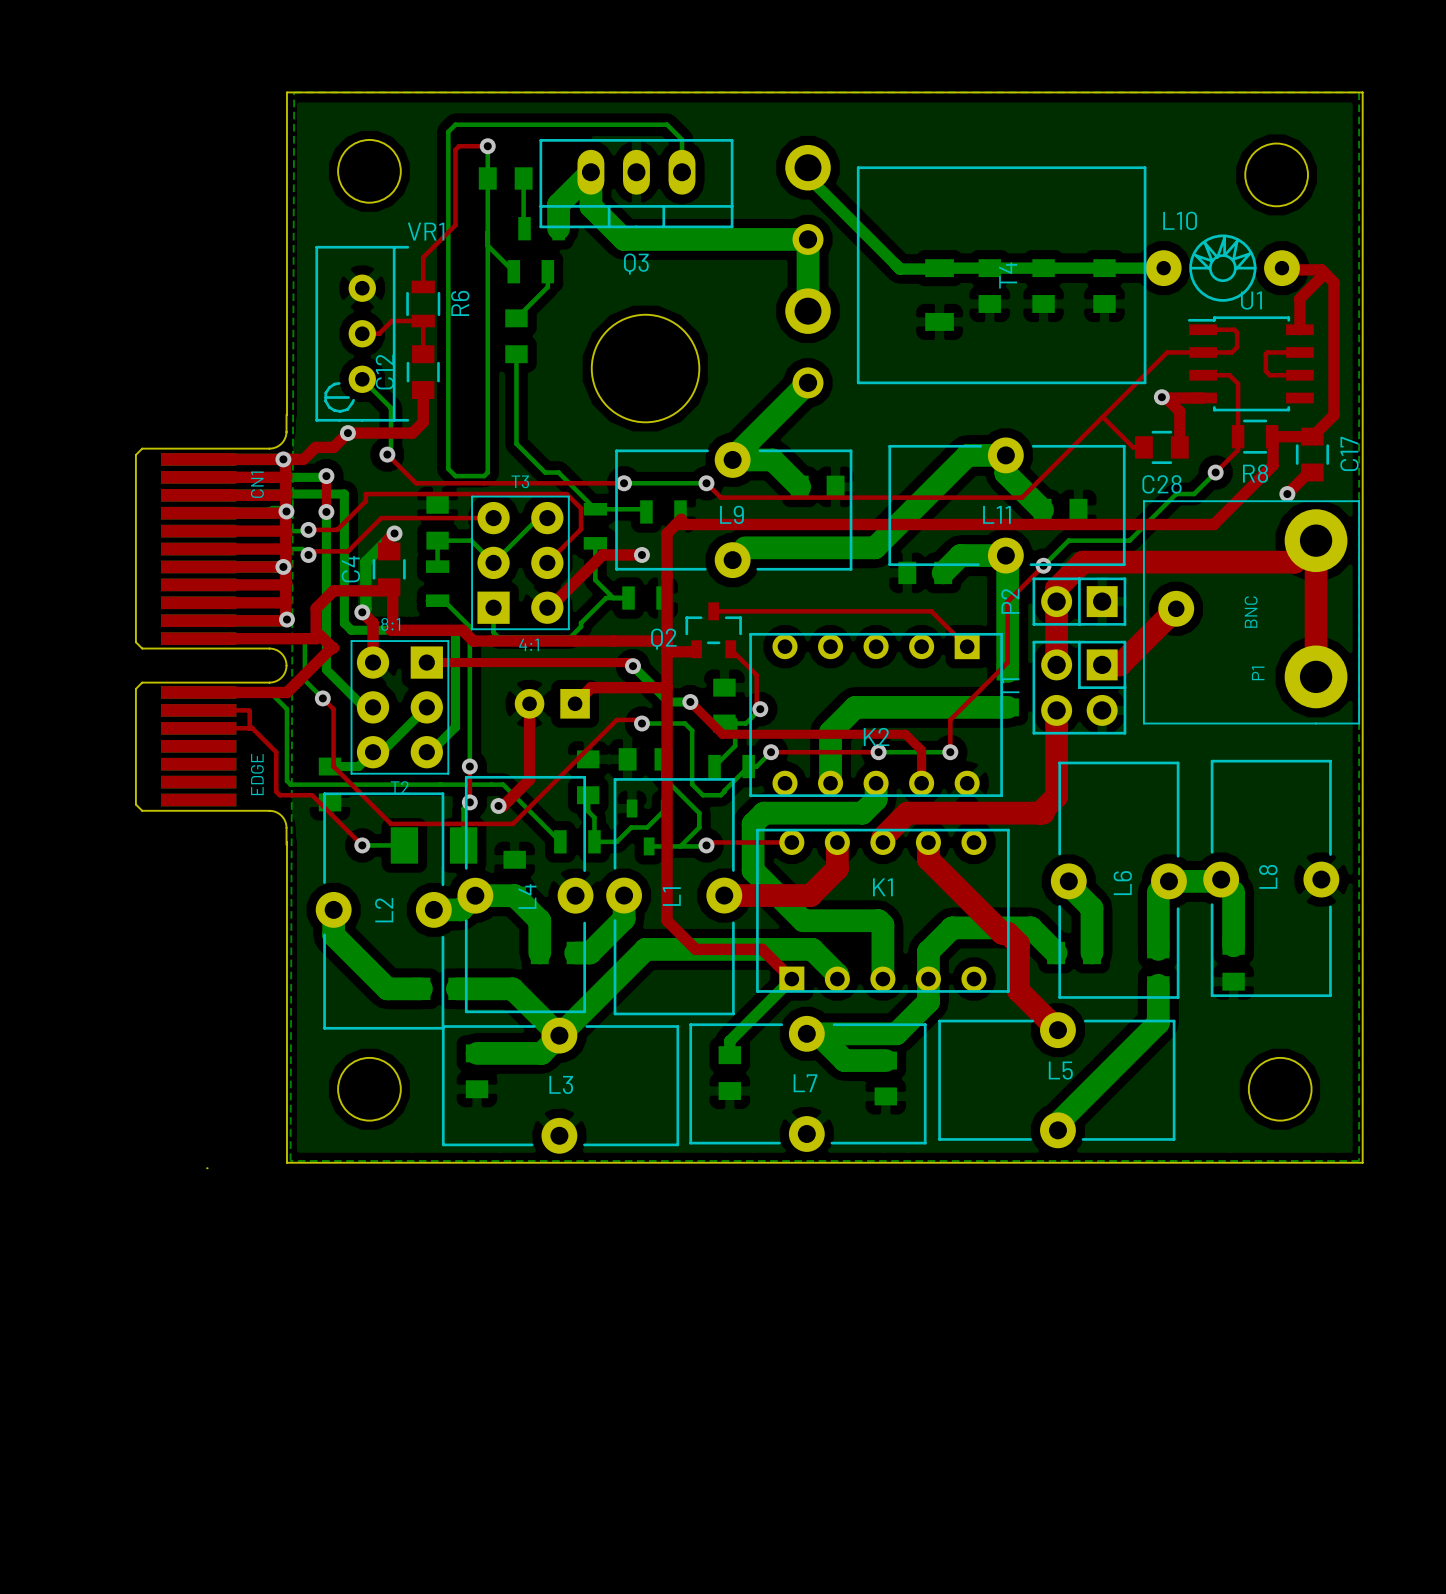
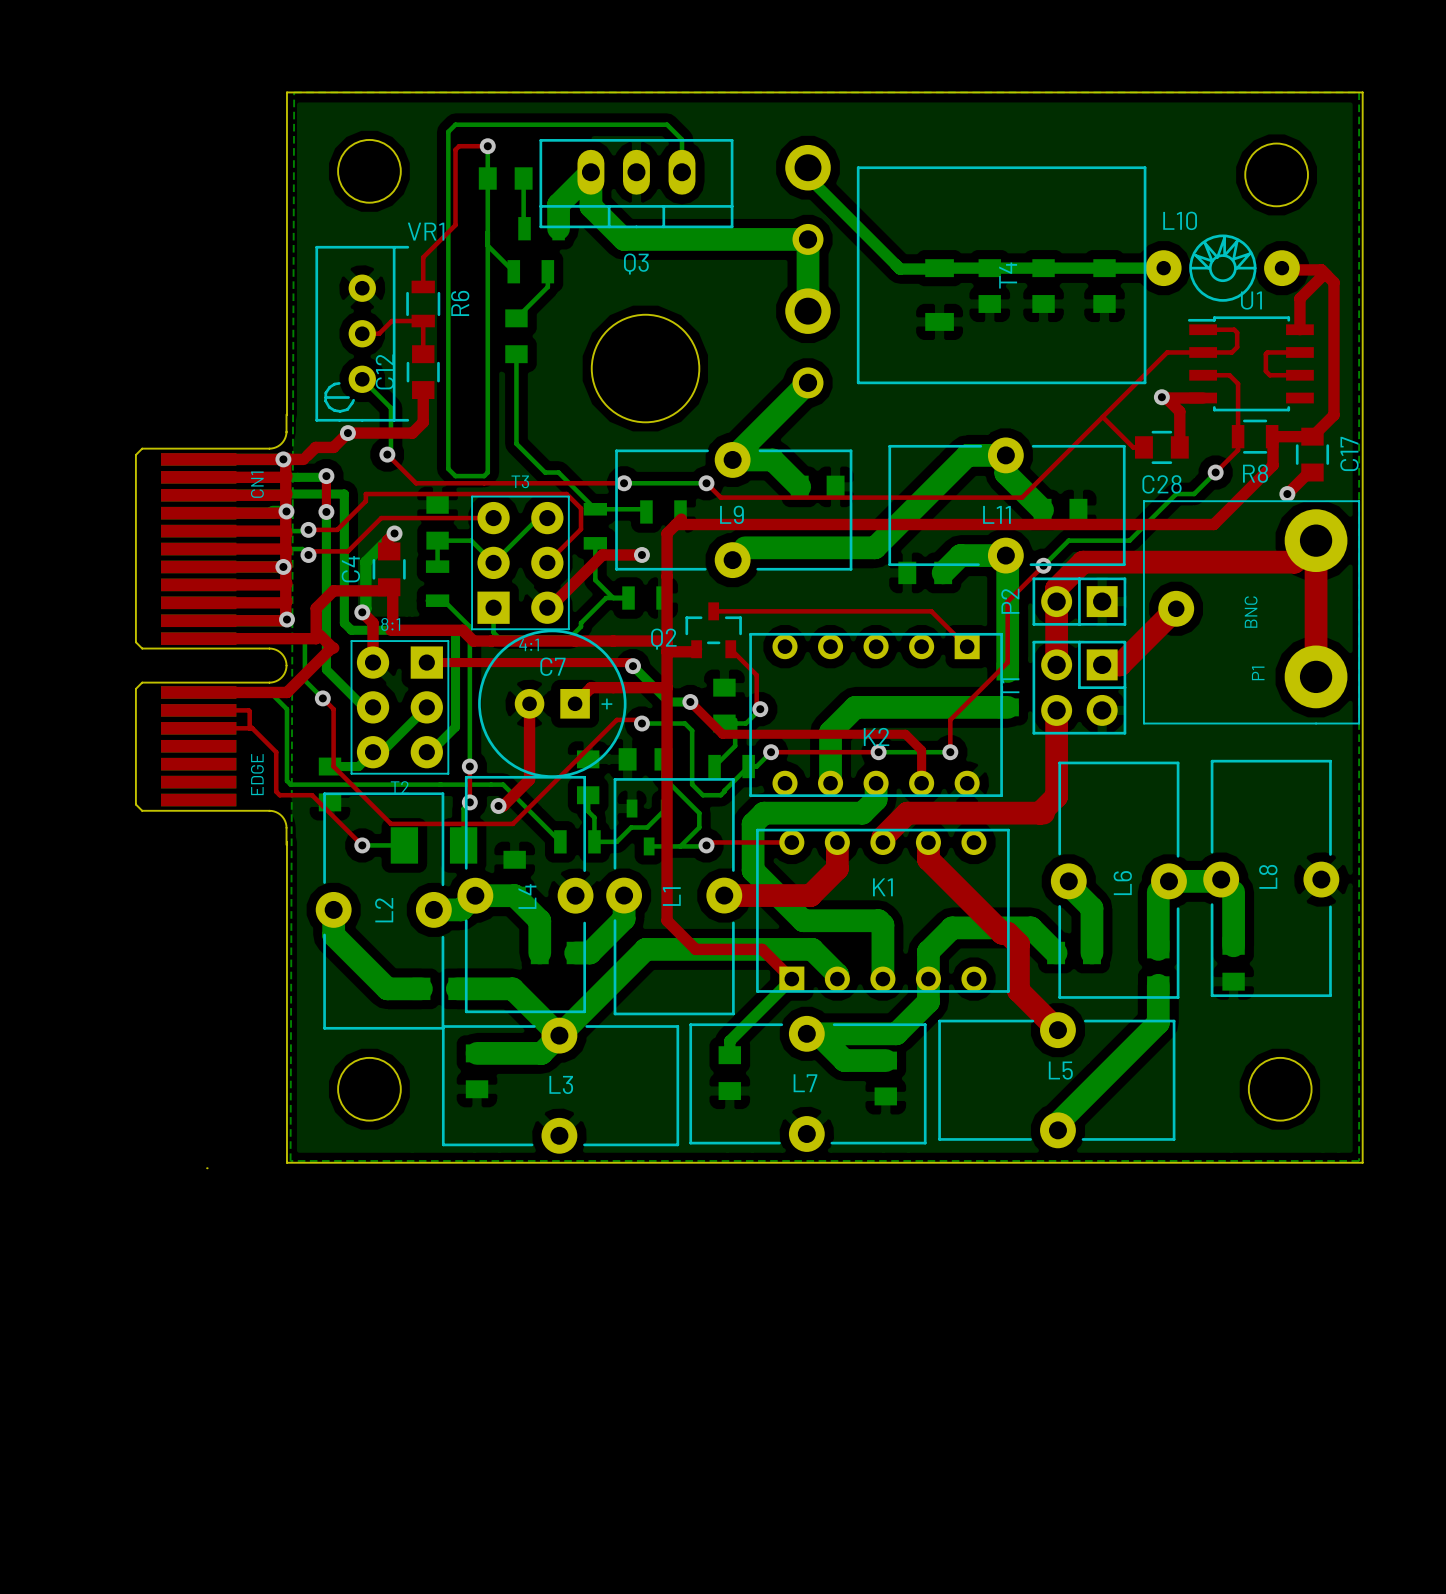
C7 side: bottom (552, 703) -> top (552, 703)

